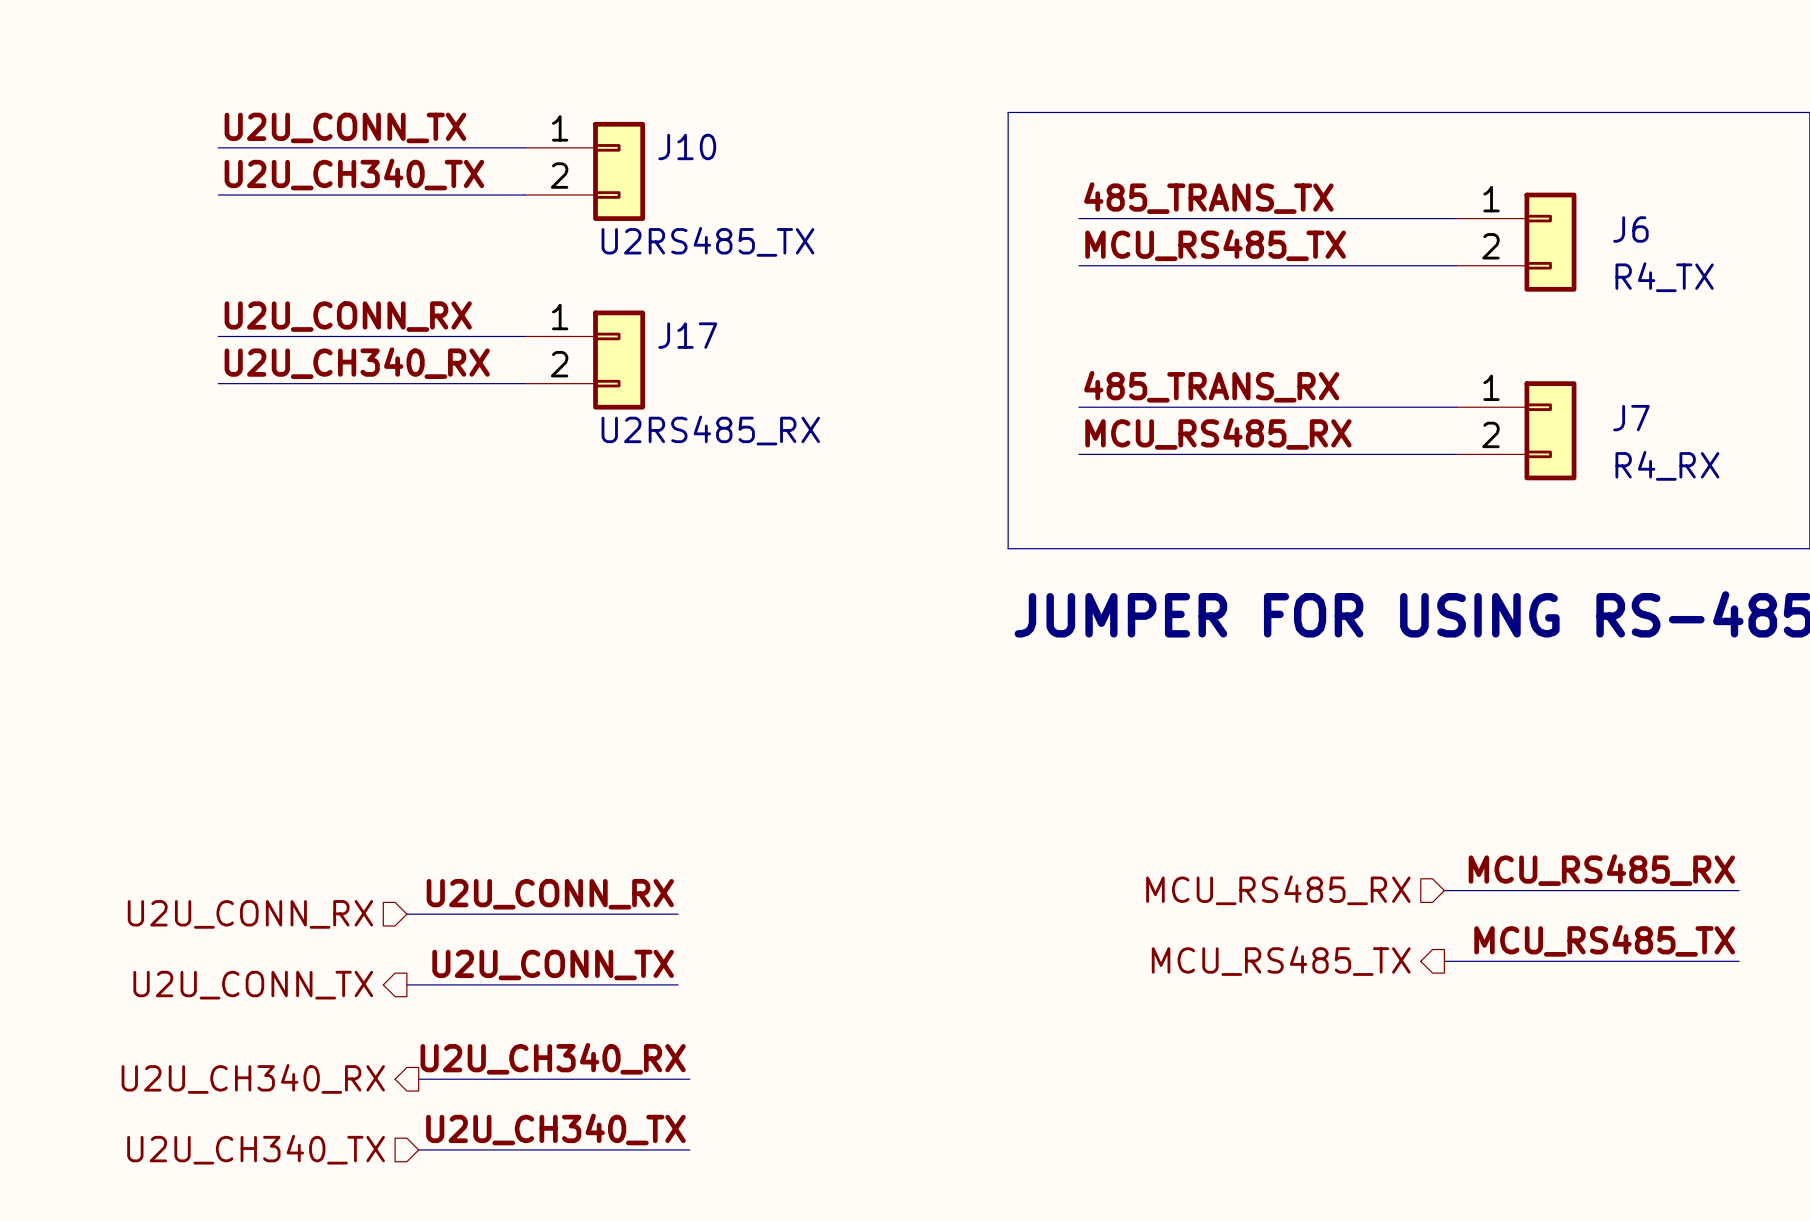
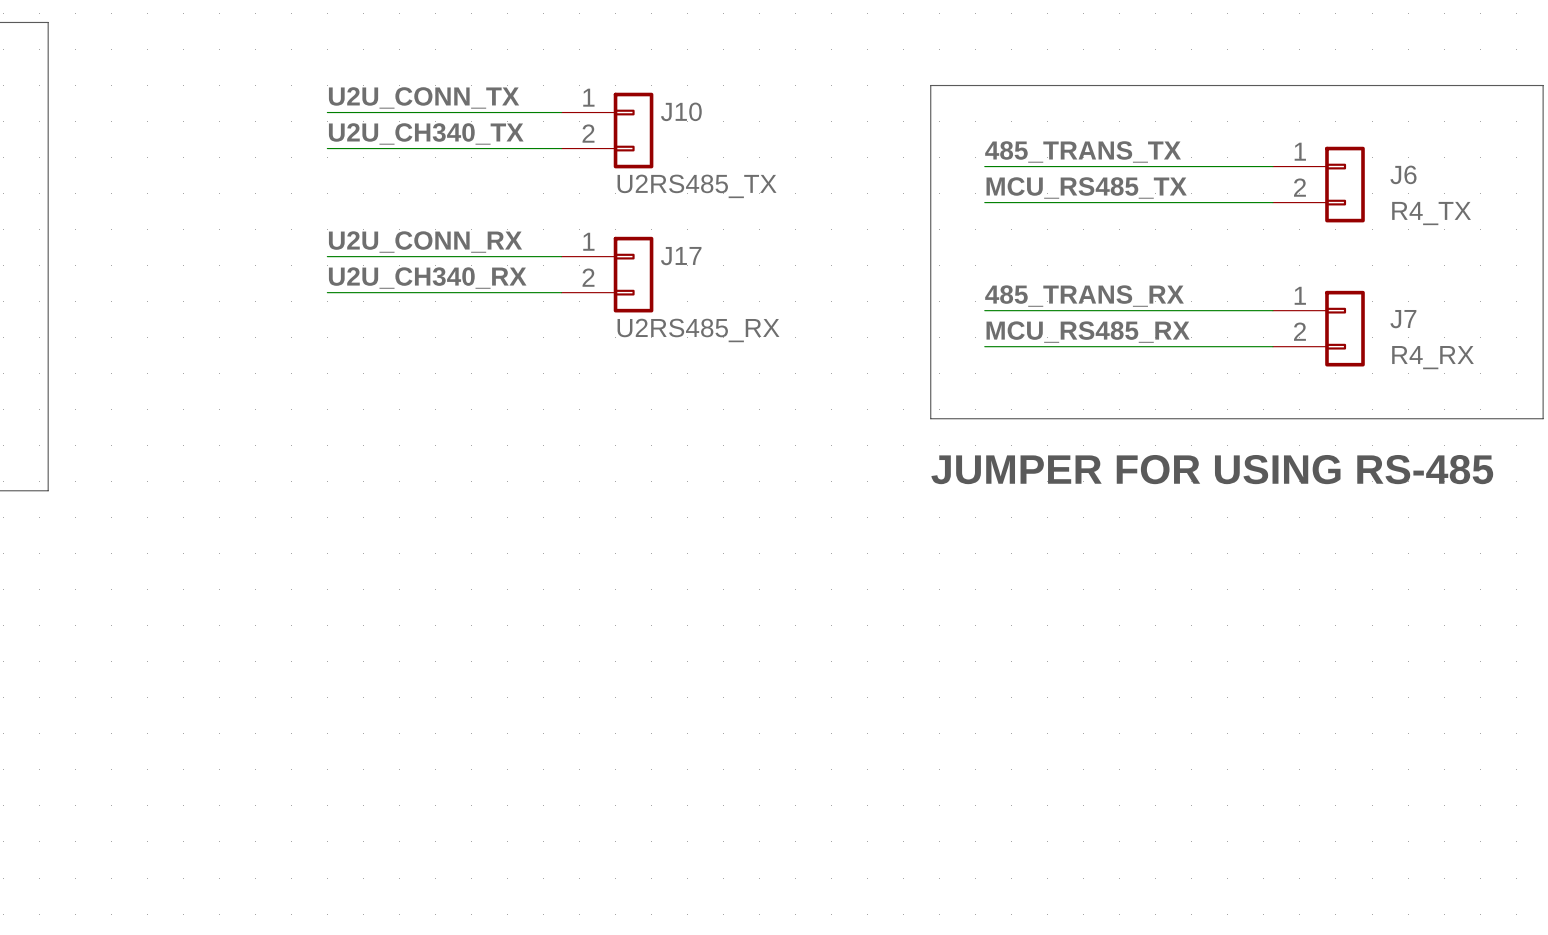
label: MCU_RS485_RX (1601, 870) -> none
hierarchical label: MCU_RS485_RX (1278, 890) -> none
wire: (1444, 890) (1739, 890) -> none
label: U2U_CONN_RX (550, 894) -> none
hierarchical label: U2U_CONN_RX (250, 914) -> none
wire: (406, 914) (678, 914) -> none
label: MCU_RS485_TX (1604, 940) -> none
hierarchical label: MCU_RS485_TX (1281, 961) -> none
wire: (1444, 961) (1739, 961) -> none
label: U2U_CONN_TX (553, 964) -> none
wire: (406, 984) (678, 984) -> none
hierarchical label: U2U_CONN_TX (253, 985) -> none
label: U2U_CH340_RX (553, 1058) -> none
hierarchical label: U2U_CH340_RX (253, 1078) -> none
wire: (418, 1079) (689, 1079) -> none
label: U2U_CH340_TX (555, 1129) -> none
hierarchical label: U2U_CH340_TX (256, 1149) -> none
wire: (418, 1149) (689, 1149) -> none

